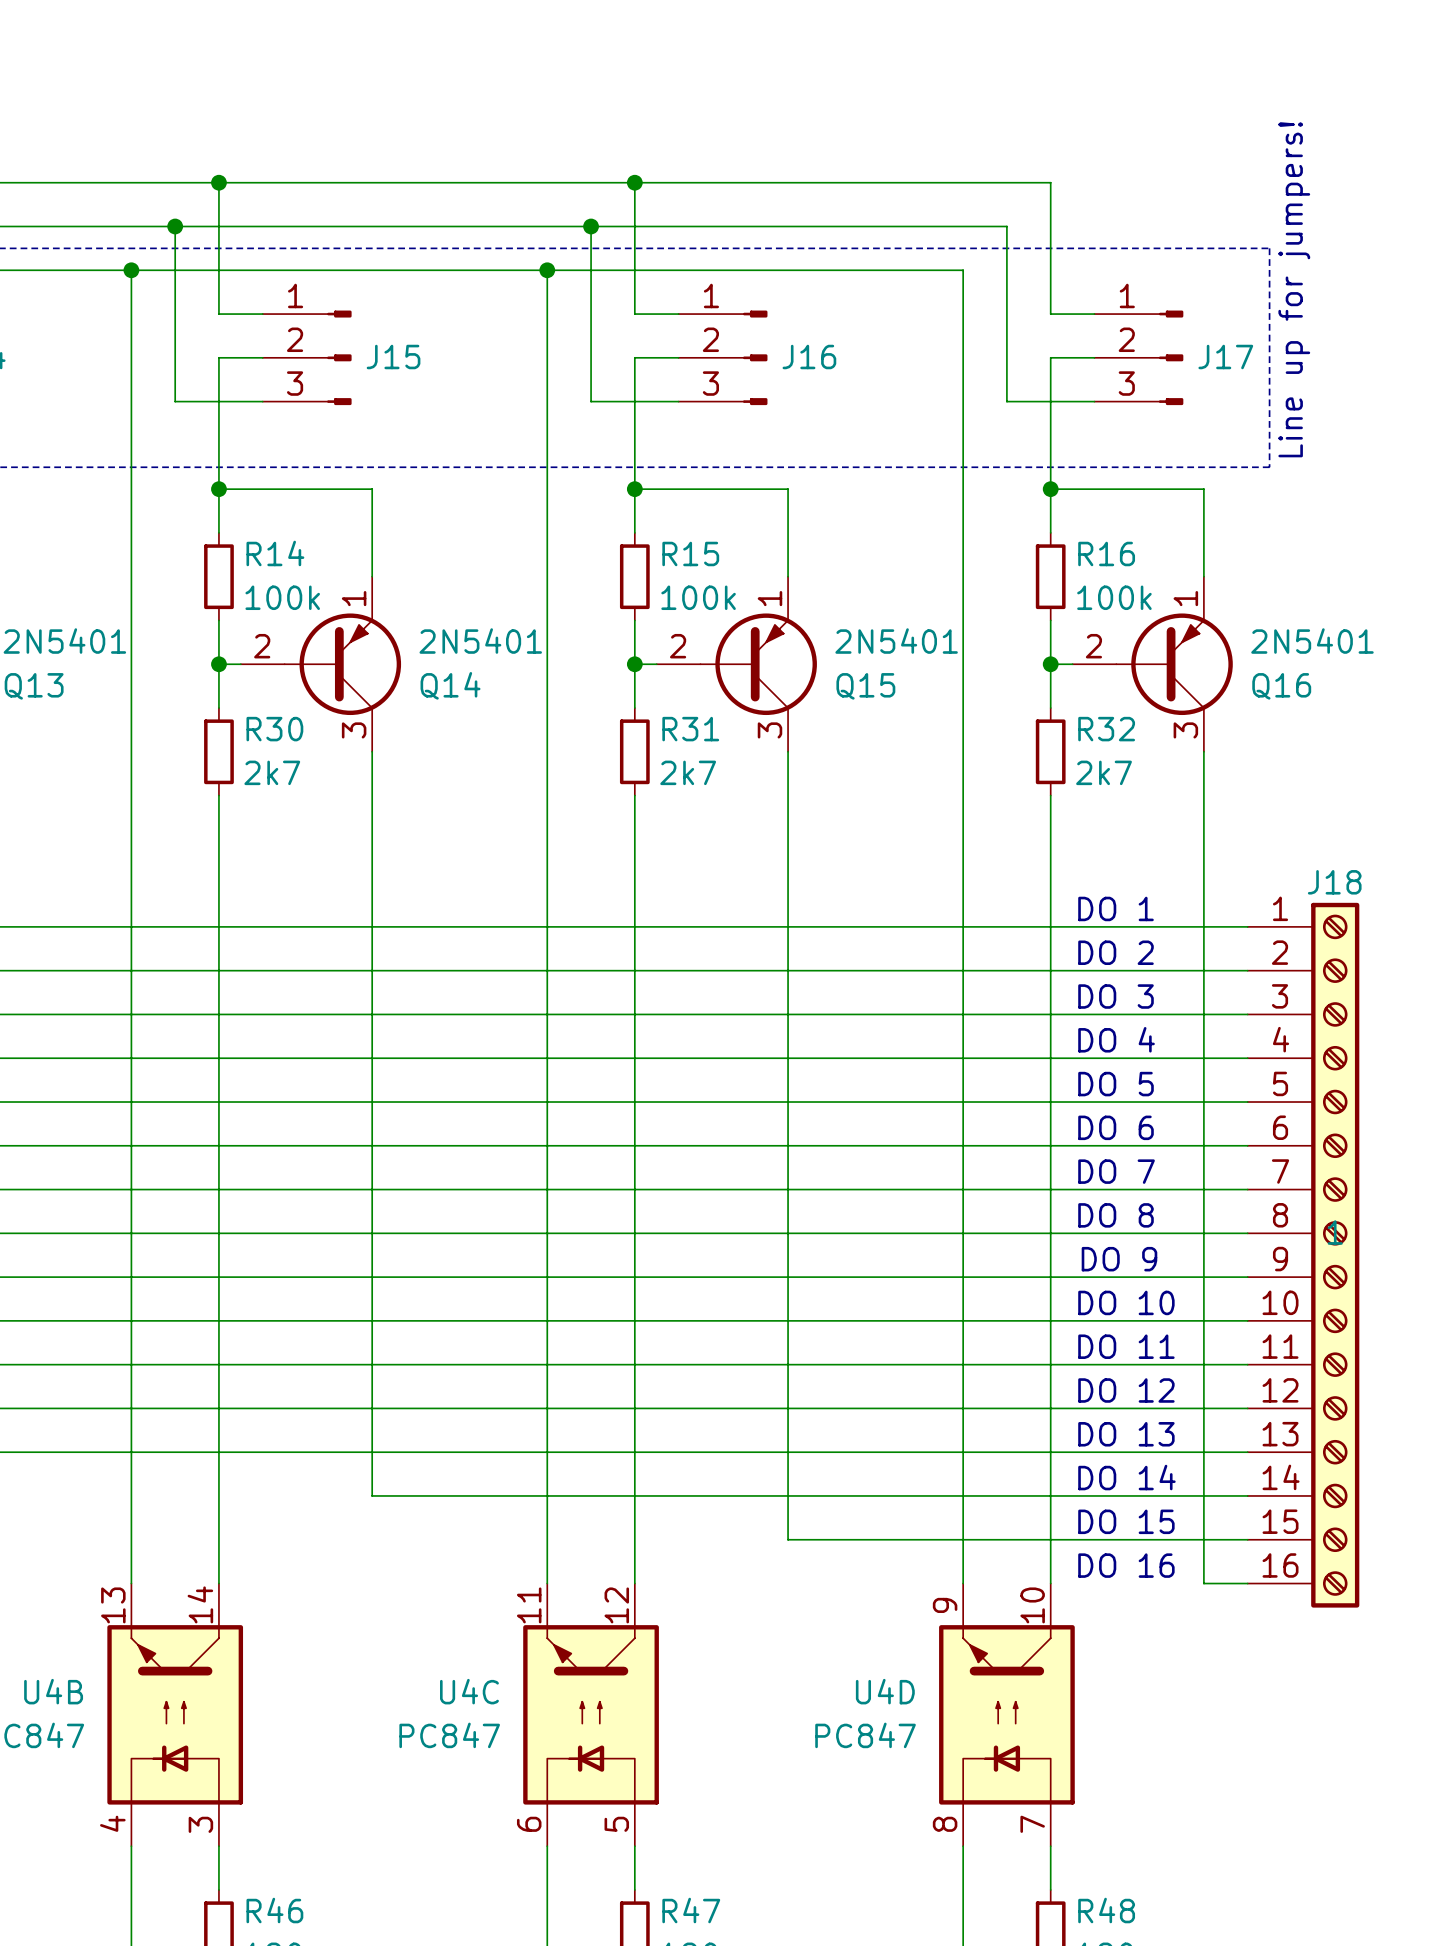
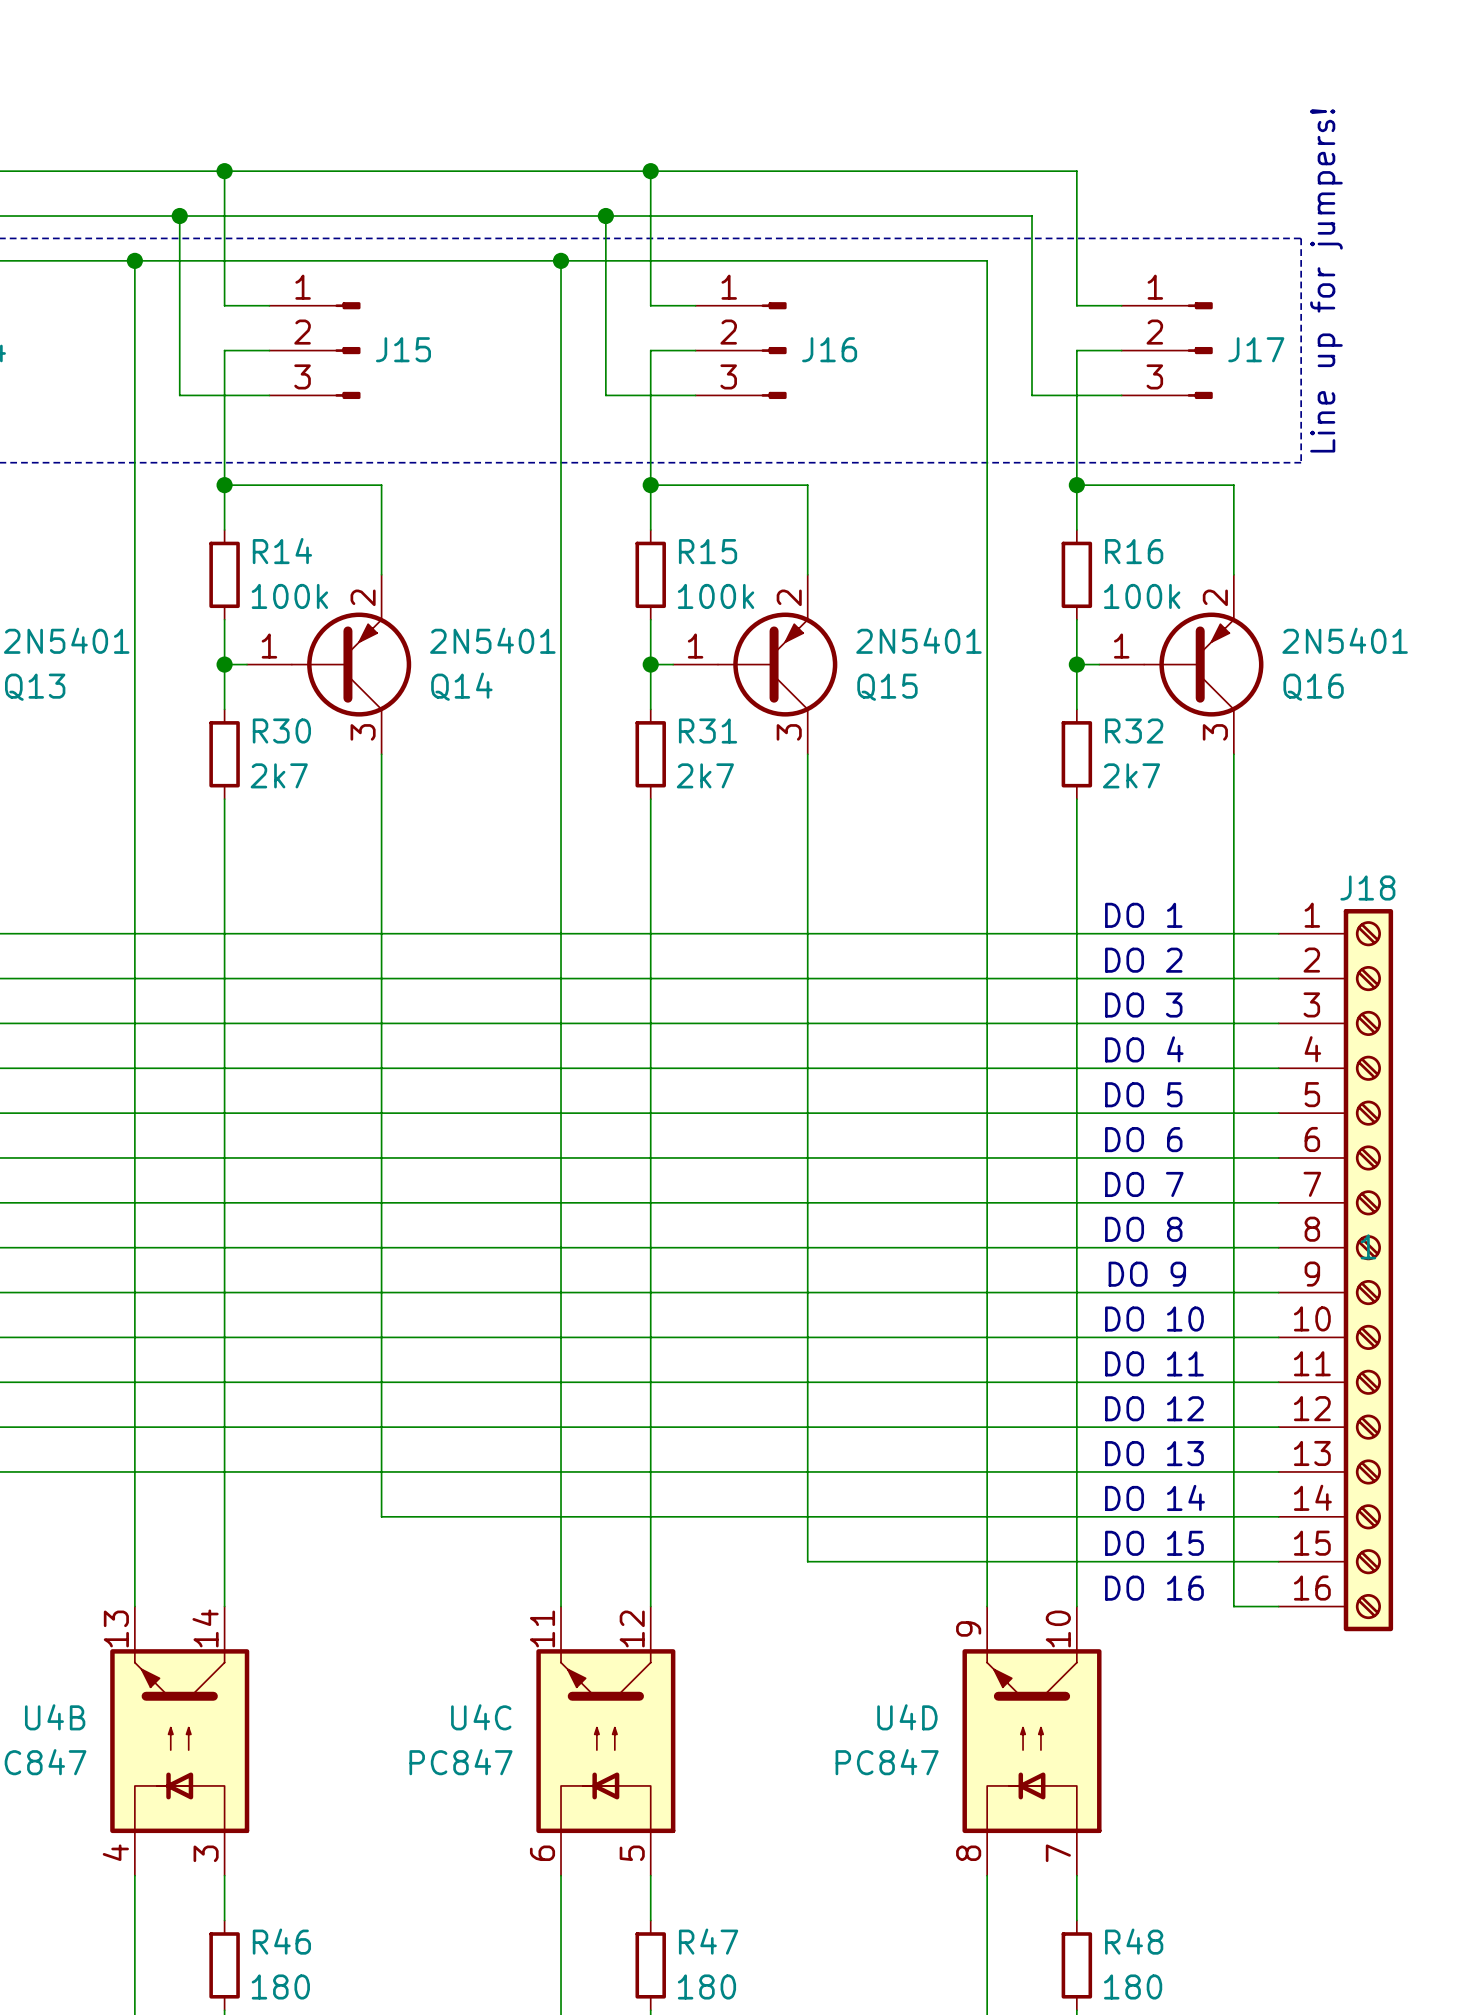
Q14 pin number: 1 (354, 598) -> 2 (363, 597)
Q15 pin number: 1 (769, 598) -> 2 (789, 597)
Q16 pin number: 1 (1185, 598) -> 2 (1215, 597)
Q14 pin number: 2 (262, 646) -> 1 (269, 646)
Q15 pin number: 2 (678, 646) -> 1 (695, 646)
Q16 pin number: 2 (1093, 646) -> 1 (1121, 646)

